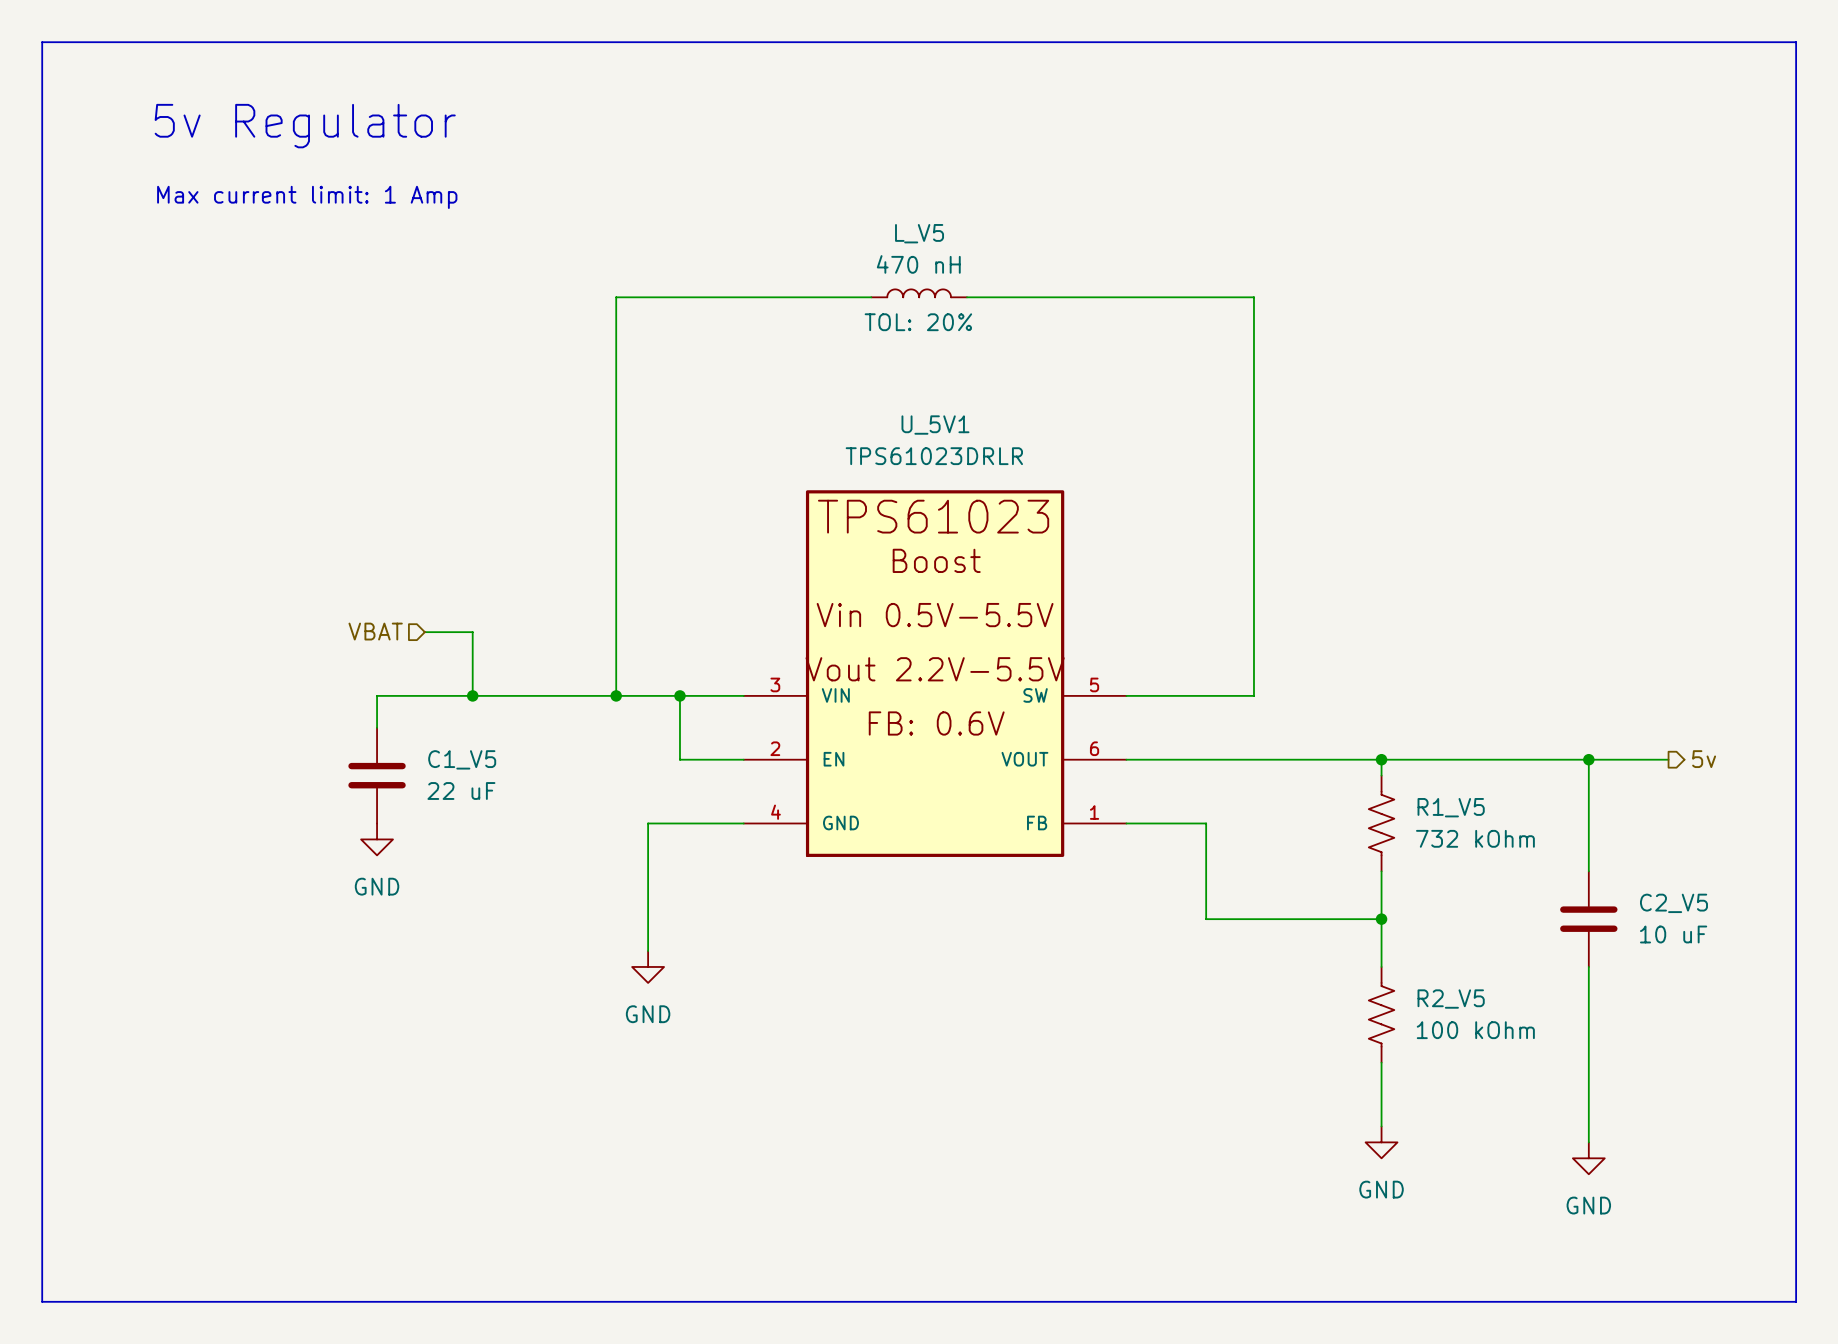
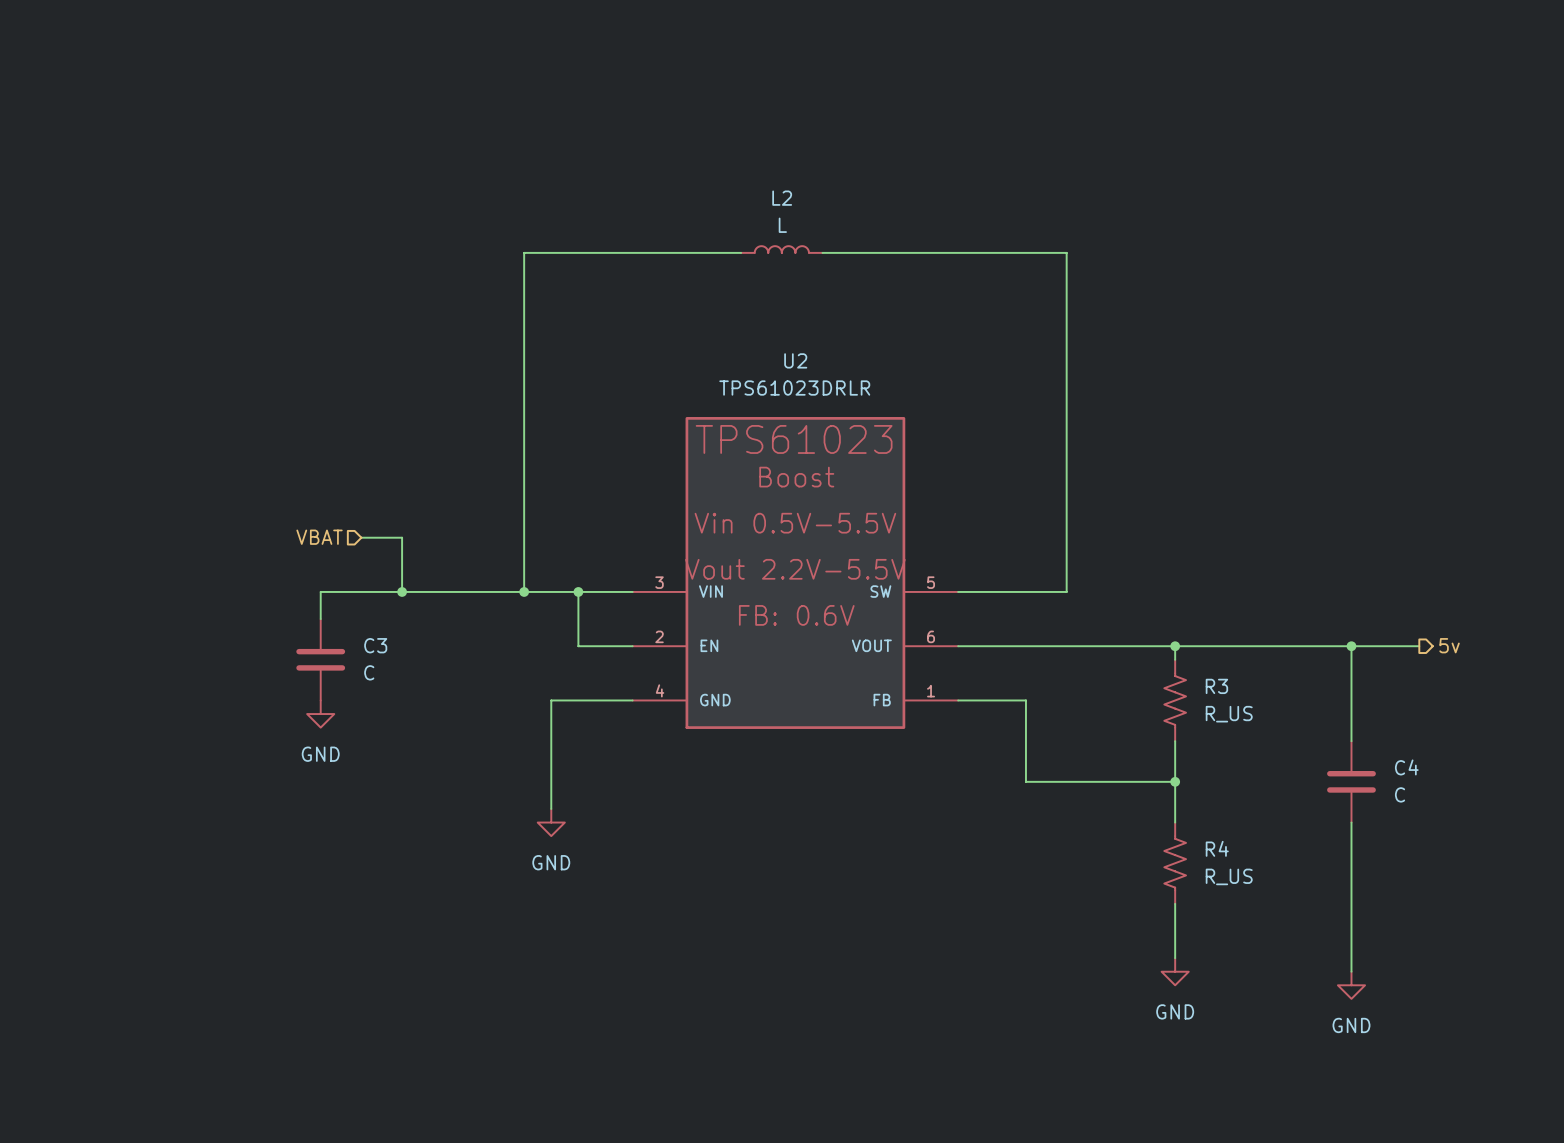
line: (42, 42) (1796, 42) (1796, 1301) (42, 1301) (42, 42) -> none
text: 5v Regulator (305, 126) -> none
text: Max current limit: 1 Amp (307, 197) -> none
L_V5 name: L_V5 (919, 233) -> L2 (782, 198)
L_V5 value: 470 nH (918, 264) -> L (782, 225)
L_V5 text: TOL: 20% (918, 322) -> none
U_5V1 name: U_5V1 (935, 425) -> U2 (795, 360)
C1_V5 name: C1_V5 (462, 759) -> C3 (375, 645)
C1_V5 value: 22 uF (461, 791) -> C (369, 672)
R1_V5 name: R1_V5 (1451, 807) -> R3 (1216, 686)
R1_V5 value: 732 kOhm (1475, 838) -> R_US (1229, 714)
C2_V5 name: C2_V5 (1673, 903) -> C4 (1406, 767)
C2_V5 value: 10 uF (1673, 934) -> C (1400, 794)
R2_V5 name: R2_V5 (1451, 999) -> R4 (1217, 848)
R2_V5 value: 100 kOhm (1475, 1030) -> R_US (1229, 876)

